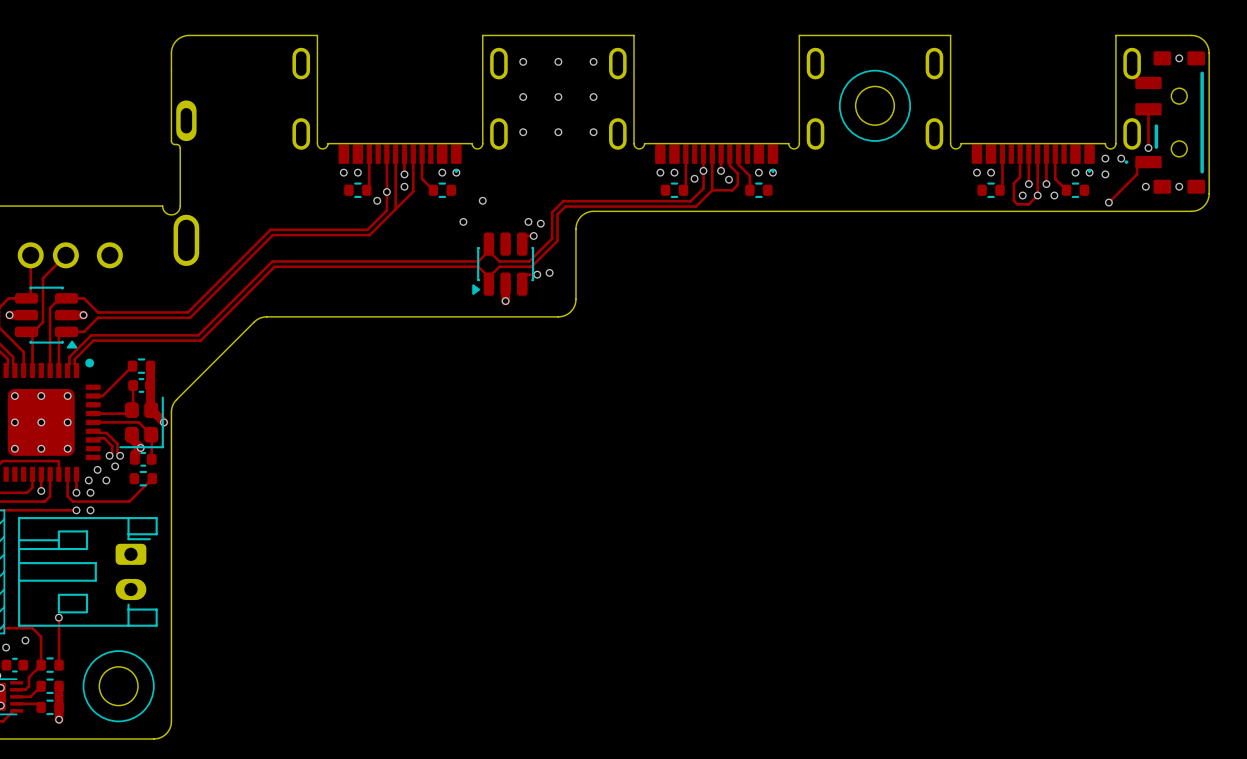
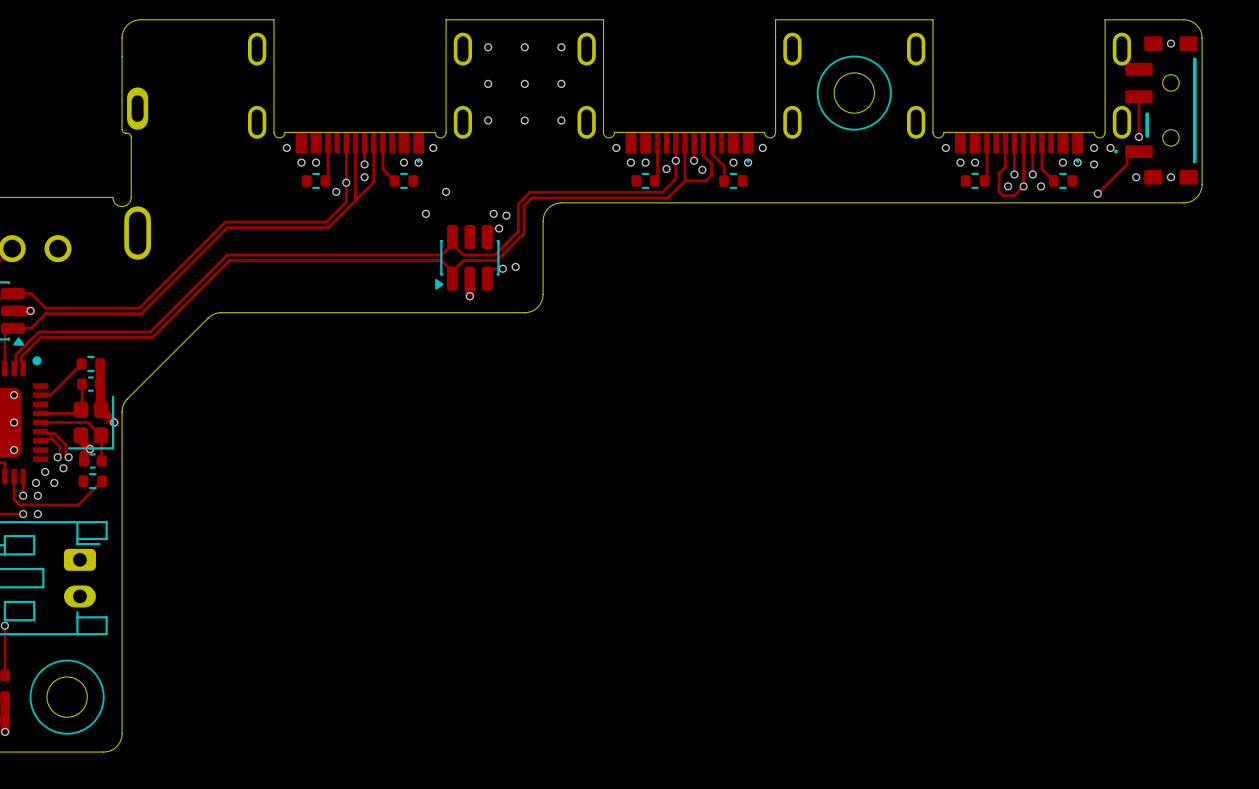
via: none -> (286, 147)
via: none -> (433, 147)
via: none -> (616, 147)
via: none -> (762, 147)
via: none -> (945, 147)

